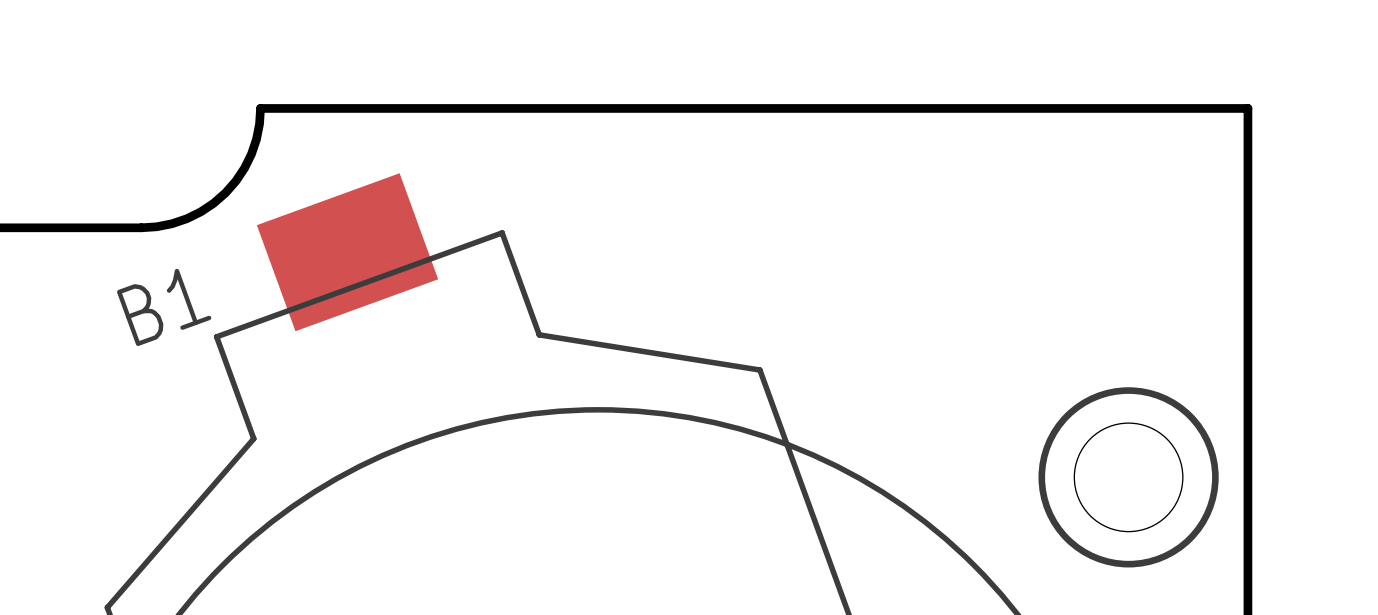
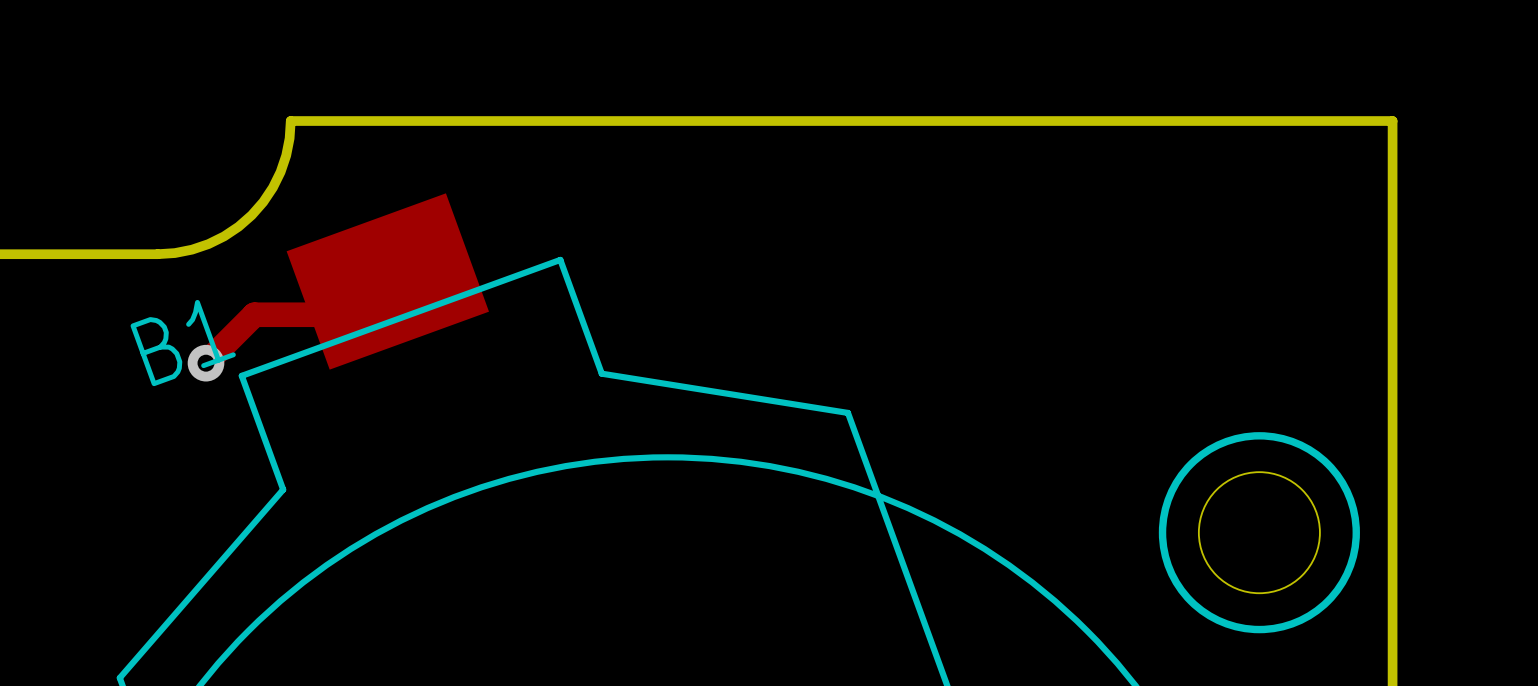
track: none -> (387, 281) (354, 314) (254, 314) (206, 363)
via: none -> (206, 363)

